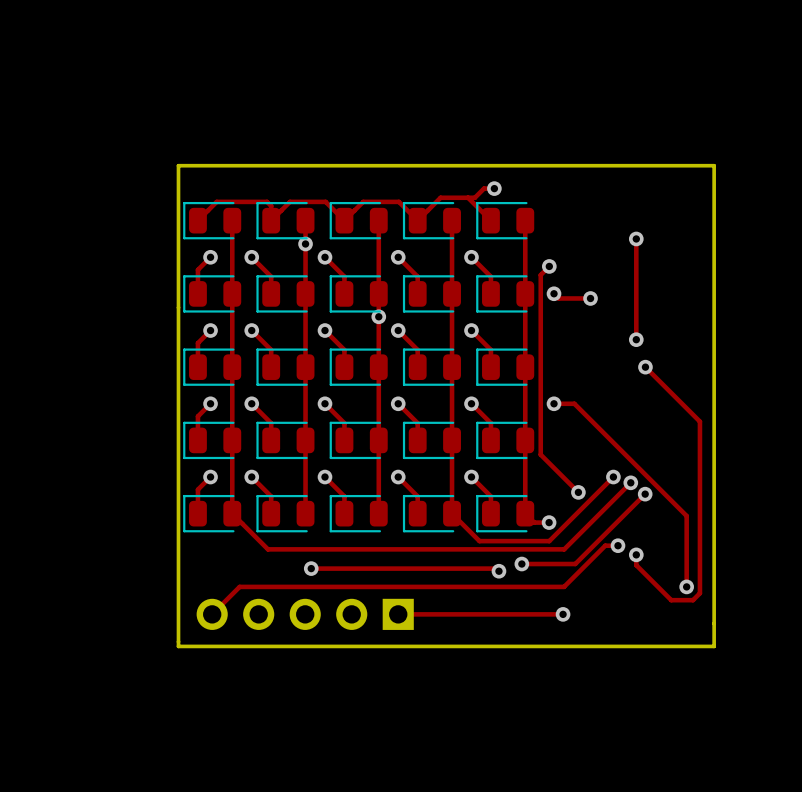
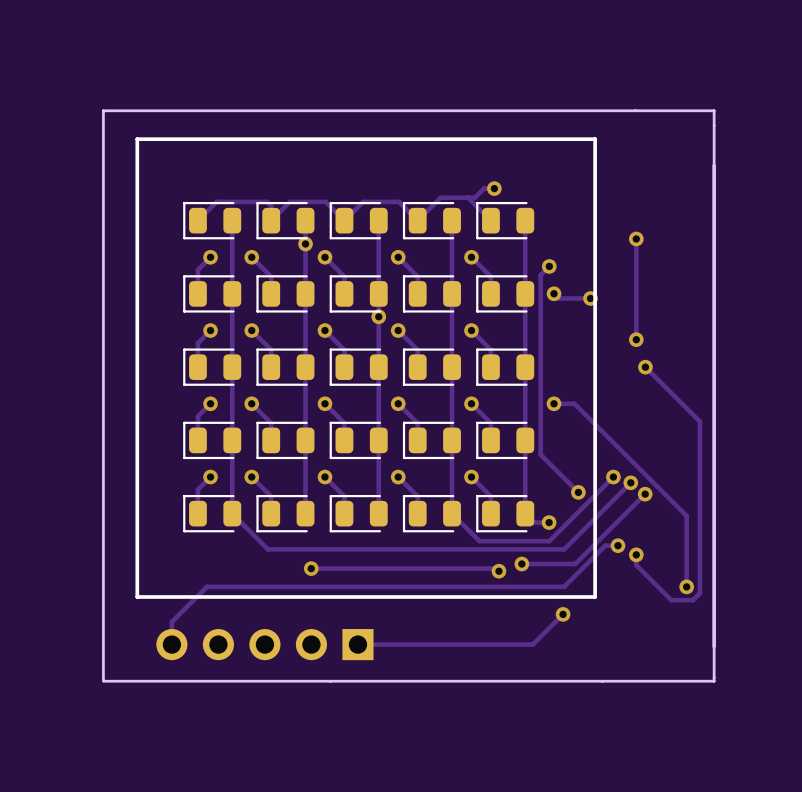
line: none -> (137, 139) (137, 596) (595, 596) (595, 139) (137, 139)
board edge: (714, 165) (178, 165) (178, 646) (714, 646) -> (714, 165) (714, 110) (103, 110) (103, 681)
track: (239, 586) (212, 614) -> (239, 586) (206, 586) (171, 621) (171, 644)
part position: (305, 614) -> (264, 644)
track: (398, 614) (563, 614) -> (357, 644) (532, 644) (563, 614)
board edge: none -> (714, 646) (714, 681) (104, 681)

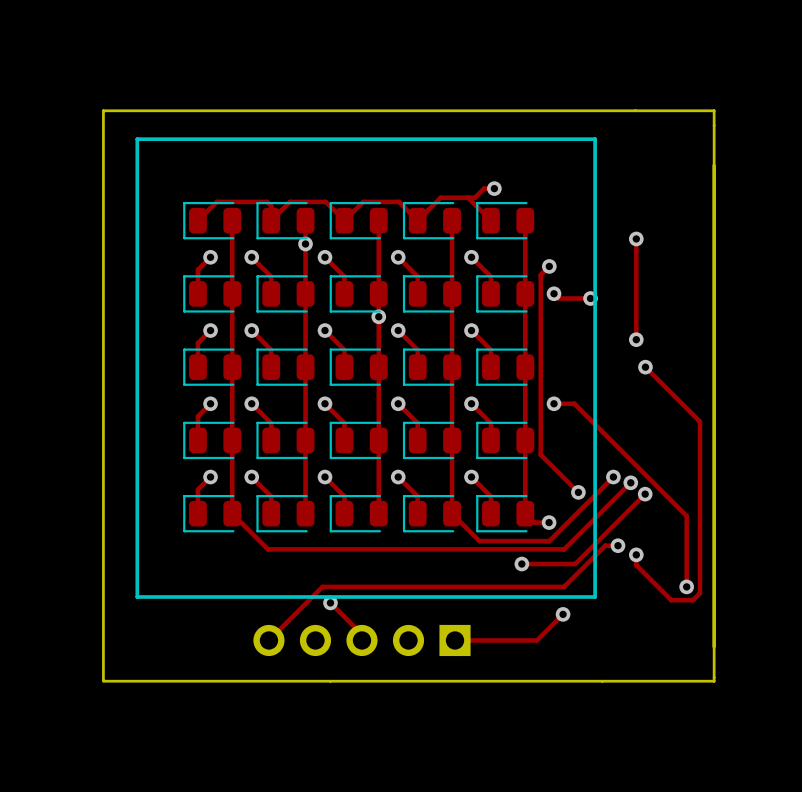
track: (311, 568) (496, 568) (498, 571) -> none
via position: (311, 568) -> (330, 602)
via: (498, 571) -> none
track: (322, 586) (206, 586) (171, 621) (171, 644) -> (322, 586) (268, 640)
track: none -> (330, 602) (361, 634) (361, 640)
track: (536, 640) (532, 644) (357, 644) -> (536, 640) (455, 640)
part position: (264, 644) -> (361, 640)

